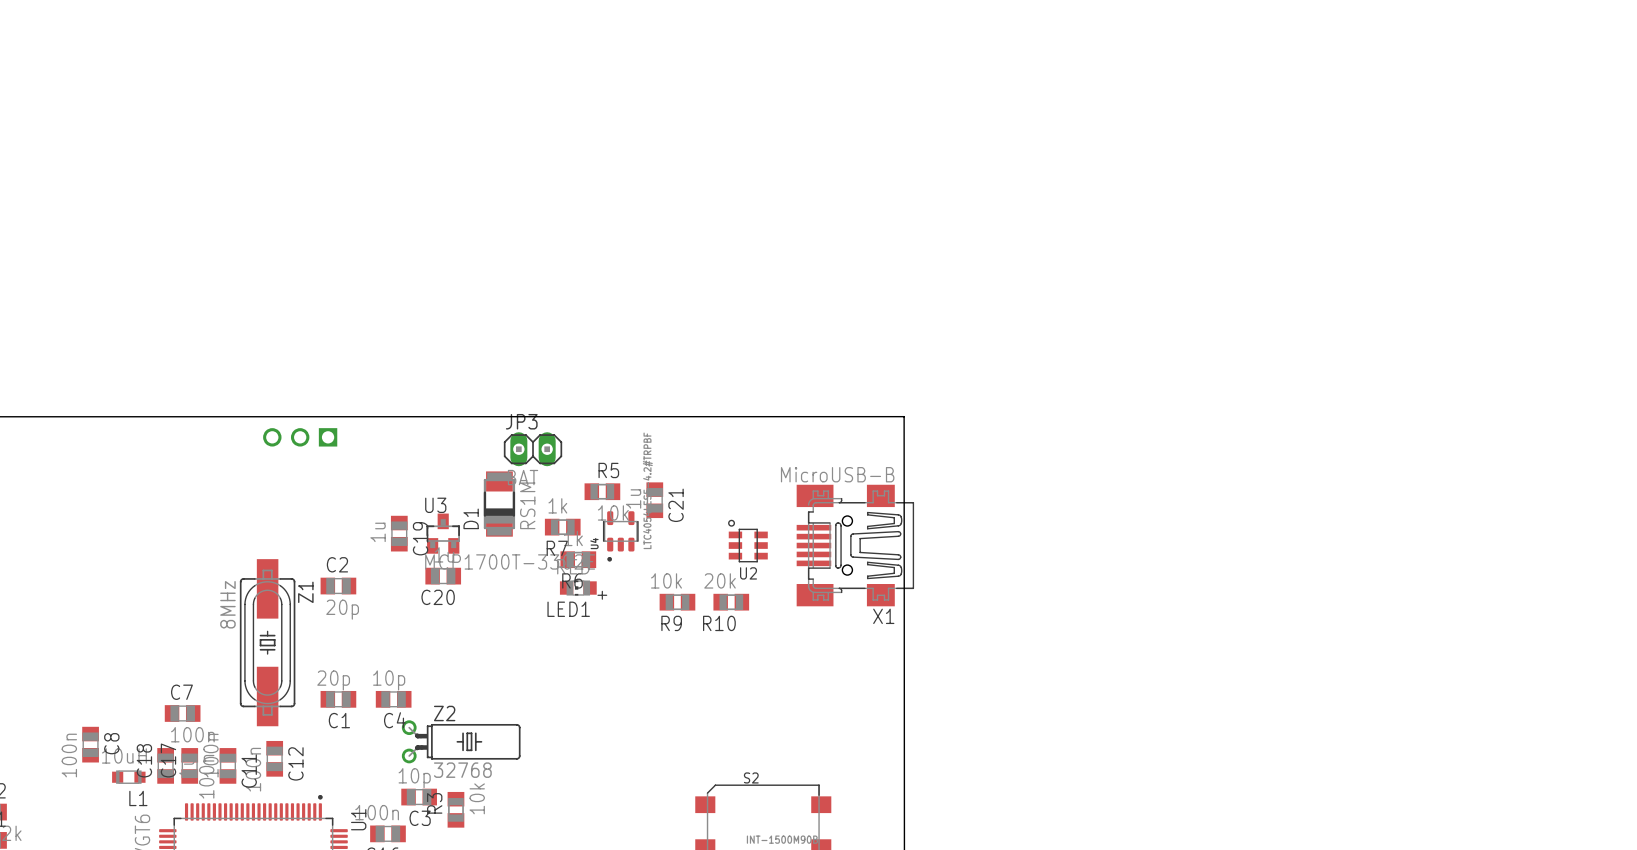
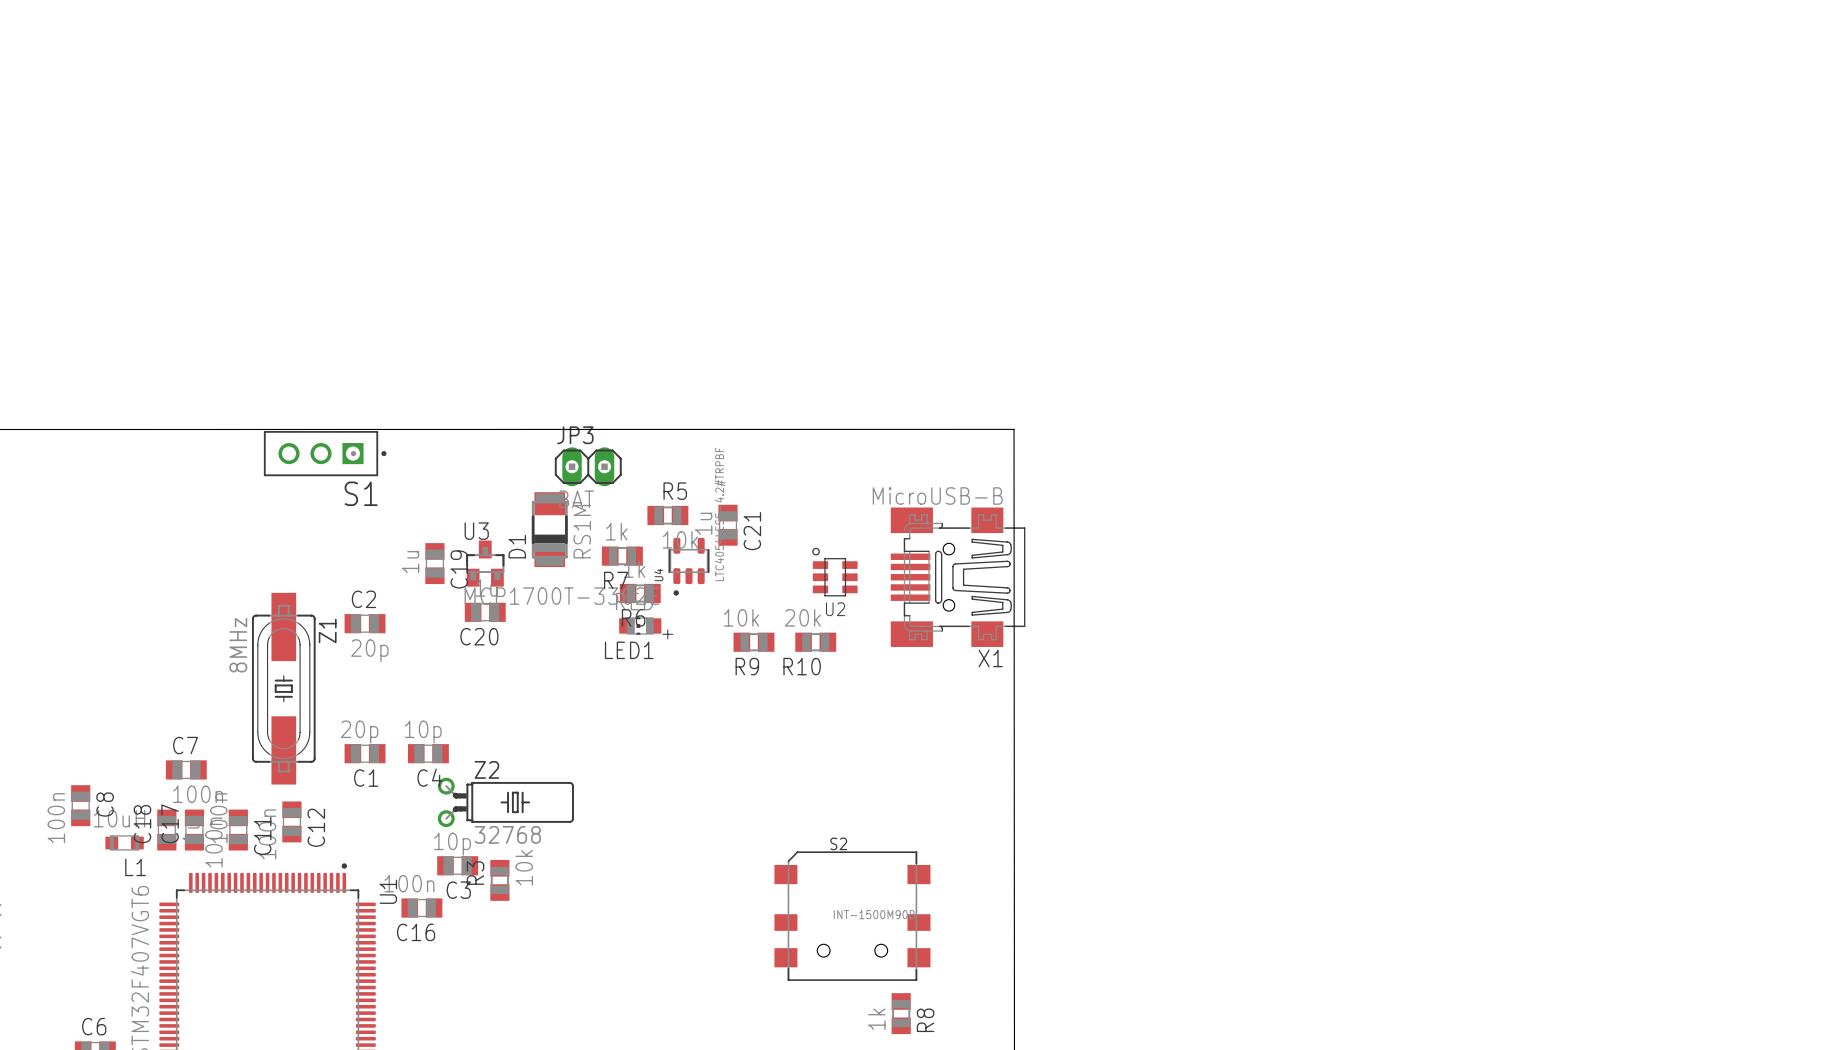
S1 side: bottom (300, 437) -> top (325, 453)

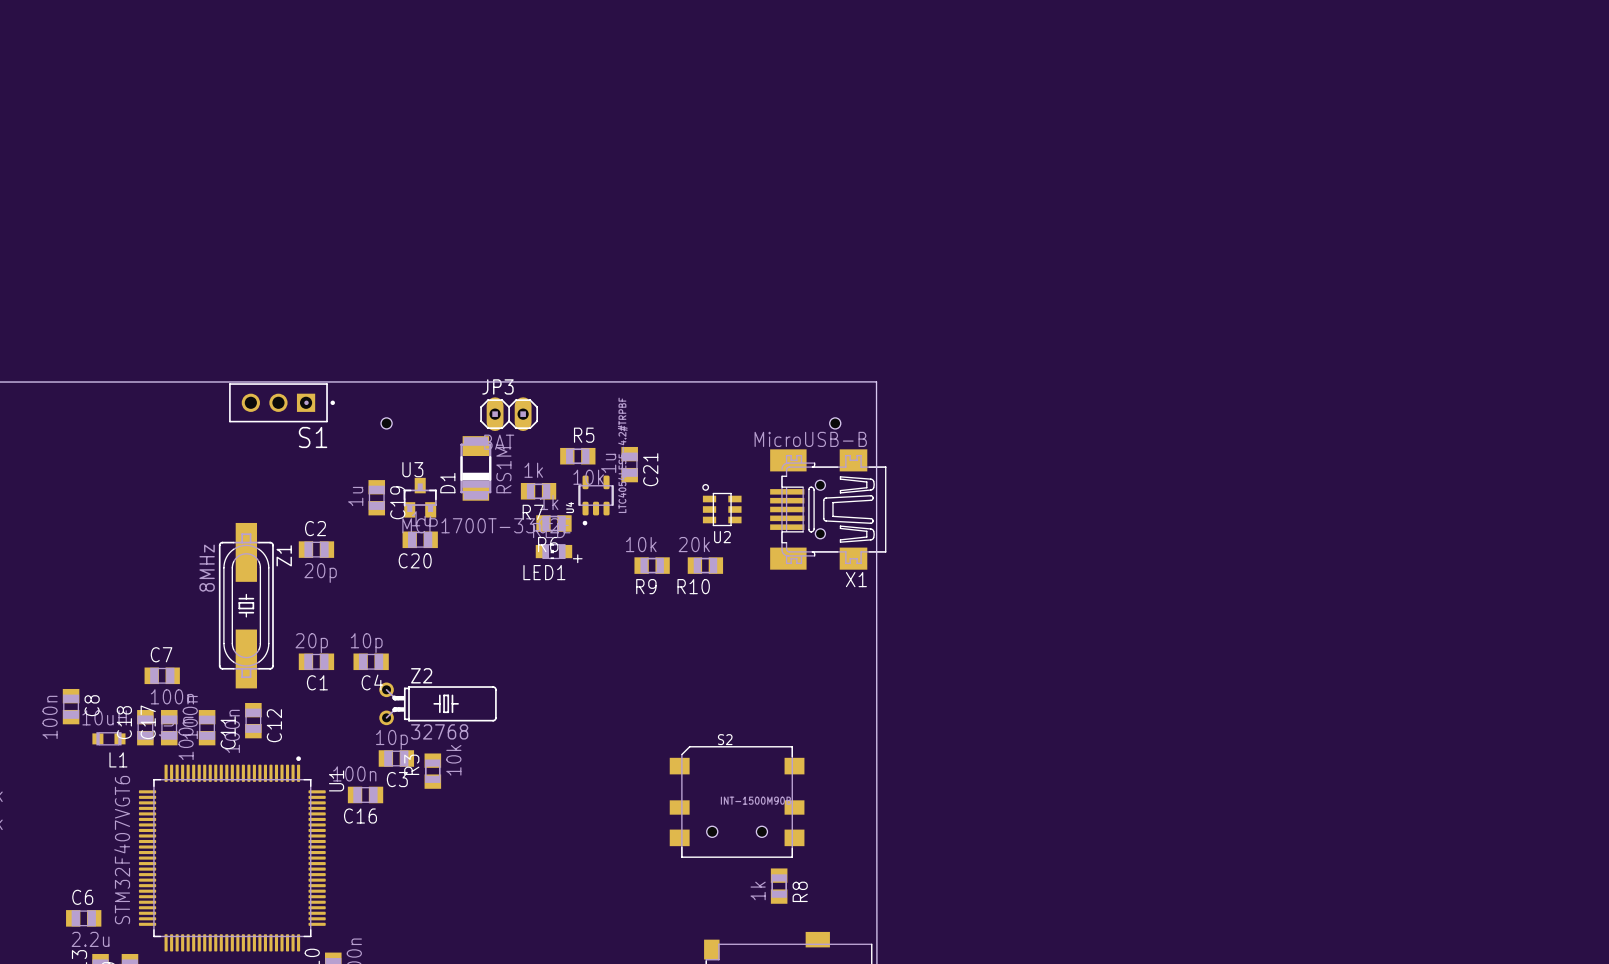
hole: none -> (386, 423)
hole: none -> (835, 423)

